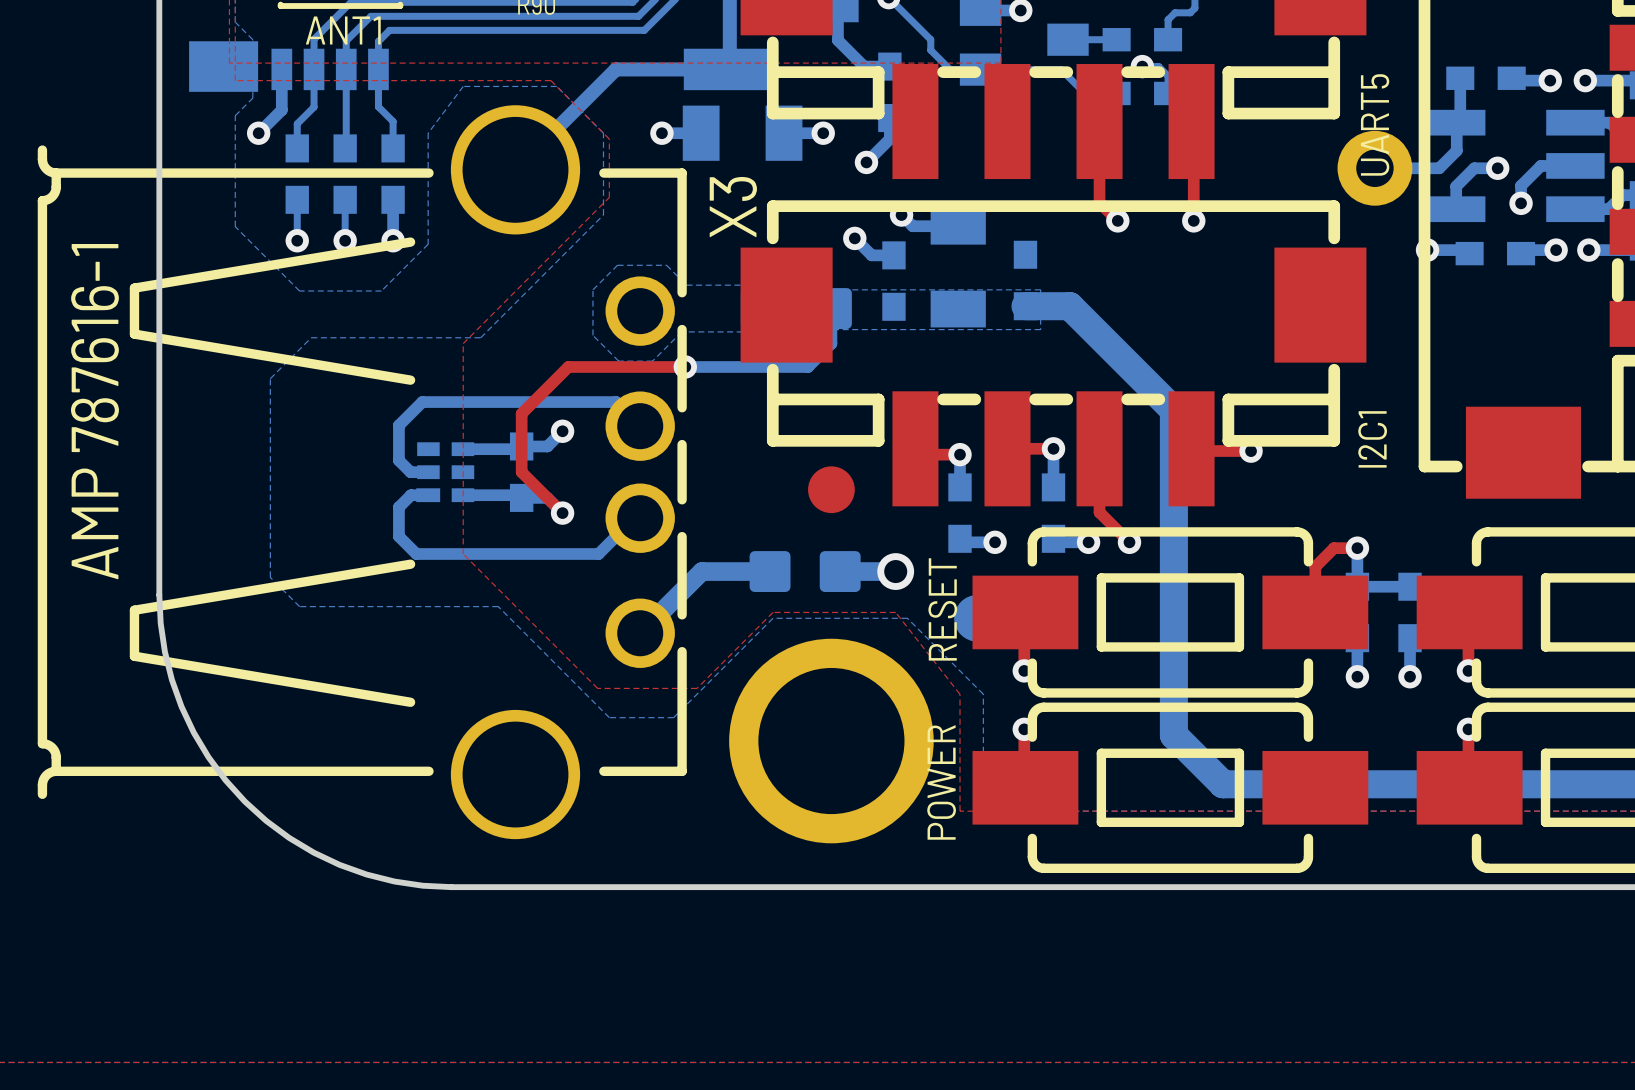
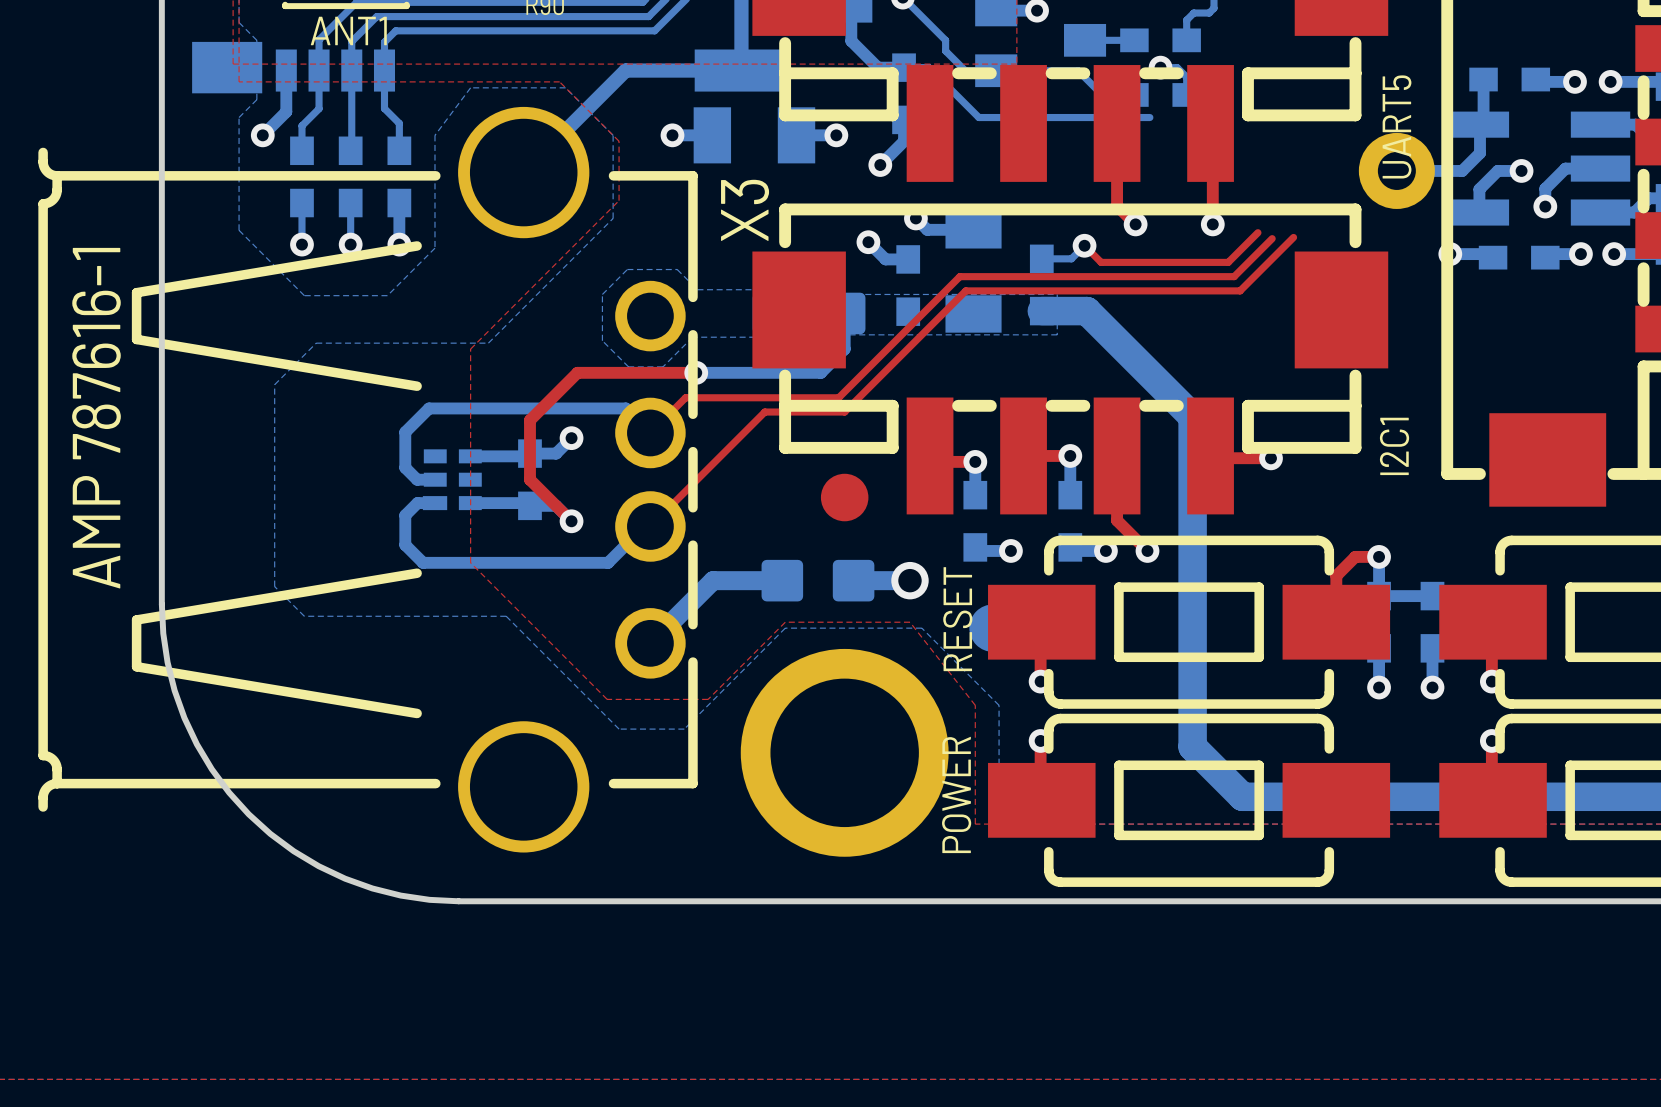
bottom track: none -> (904, 67) (928, 67) (978, 117) (1149, 117)
top track: none -> (1257, 232) (1228, 262) (1101, 262) (1084, 245)
top track: none -> (1293, 237) (1240, 290) (965, 290) (844, 412) (764, 412) (650, 526)
top track: none -> (1272, 238) (1234, 276) (959, 276) (838, 397) (685, 397) (650, 432)
bottom track: none -> (1084, 245) (1071, 258) (1041, 258)
via: none -> (1084, 245)

